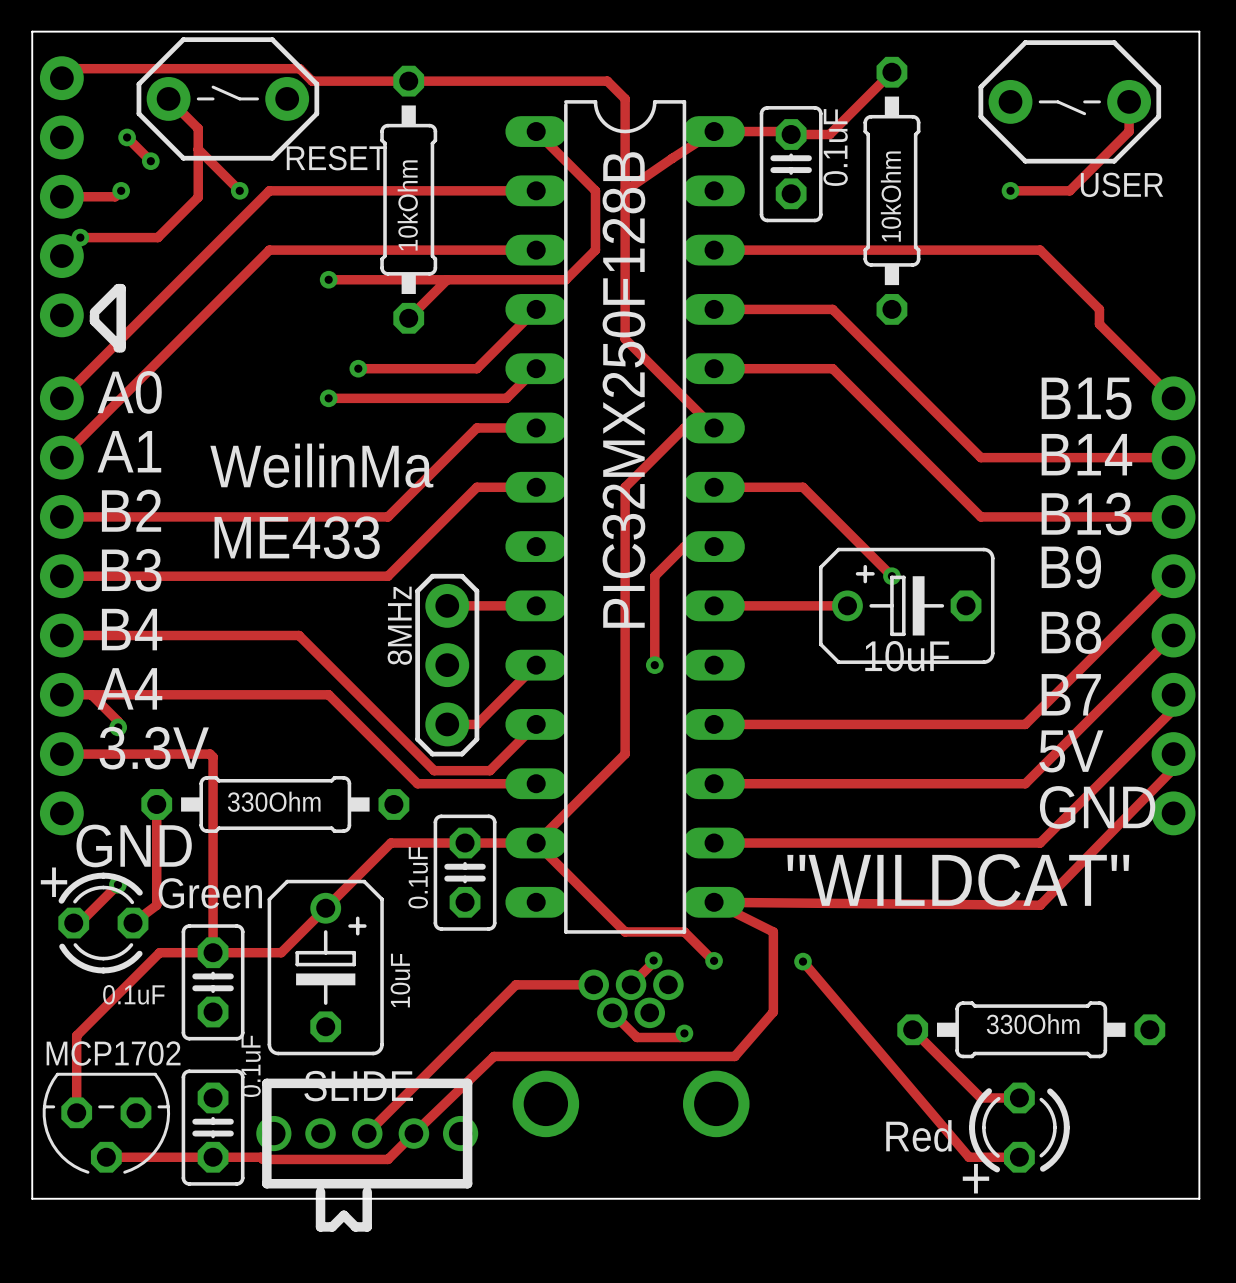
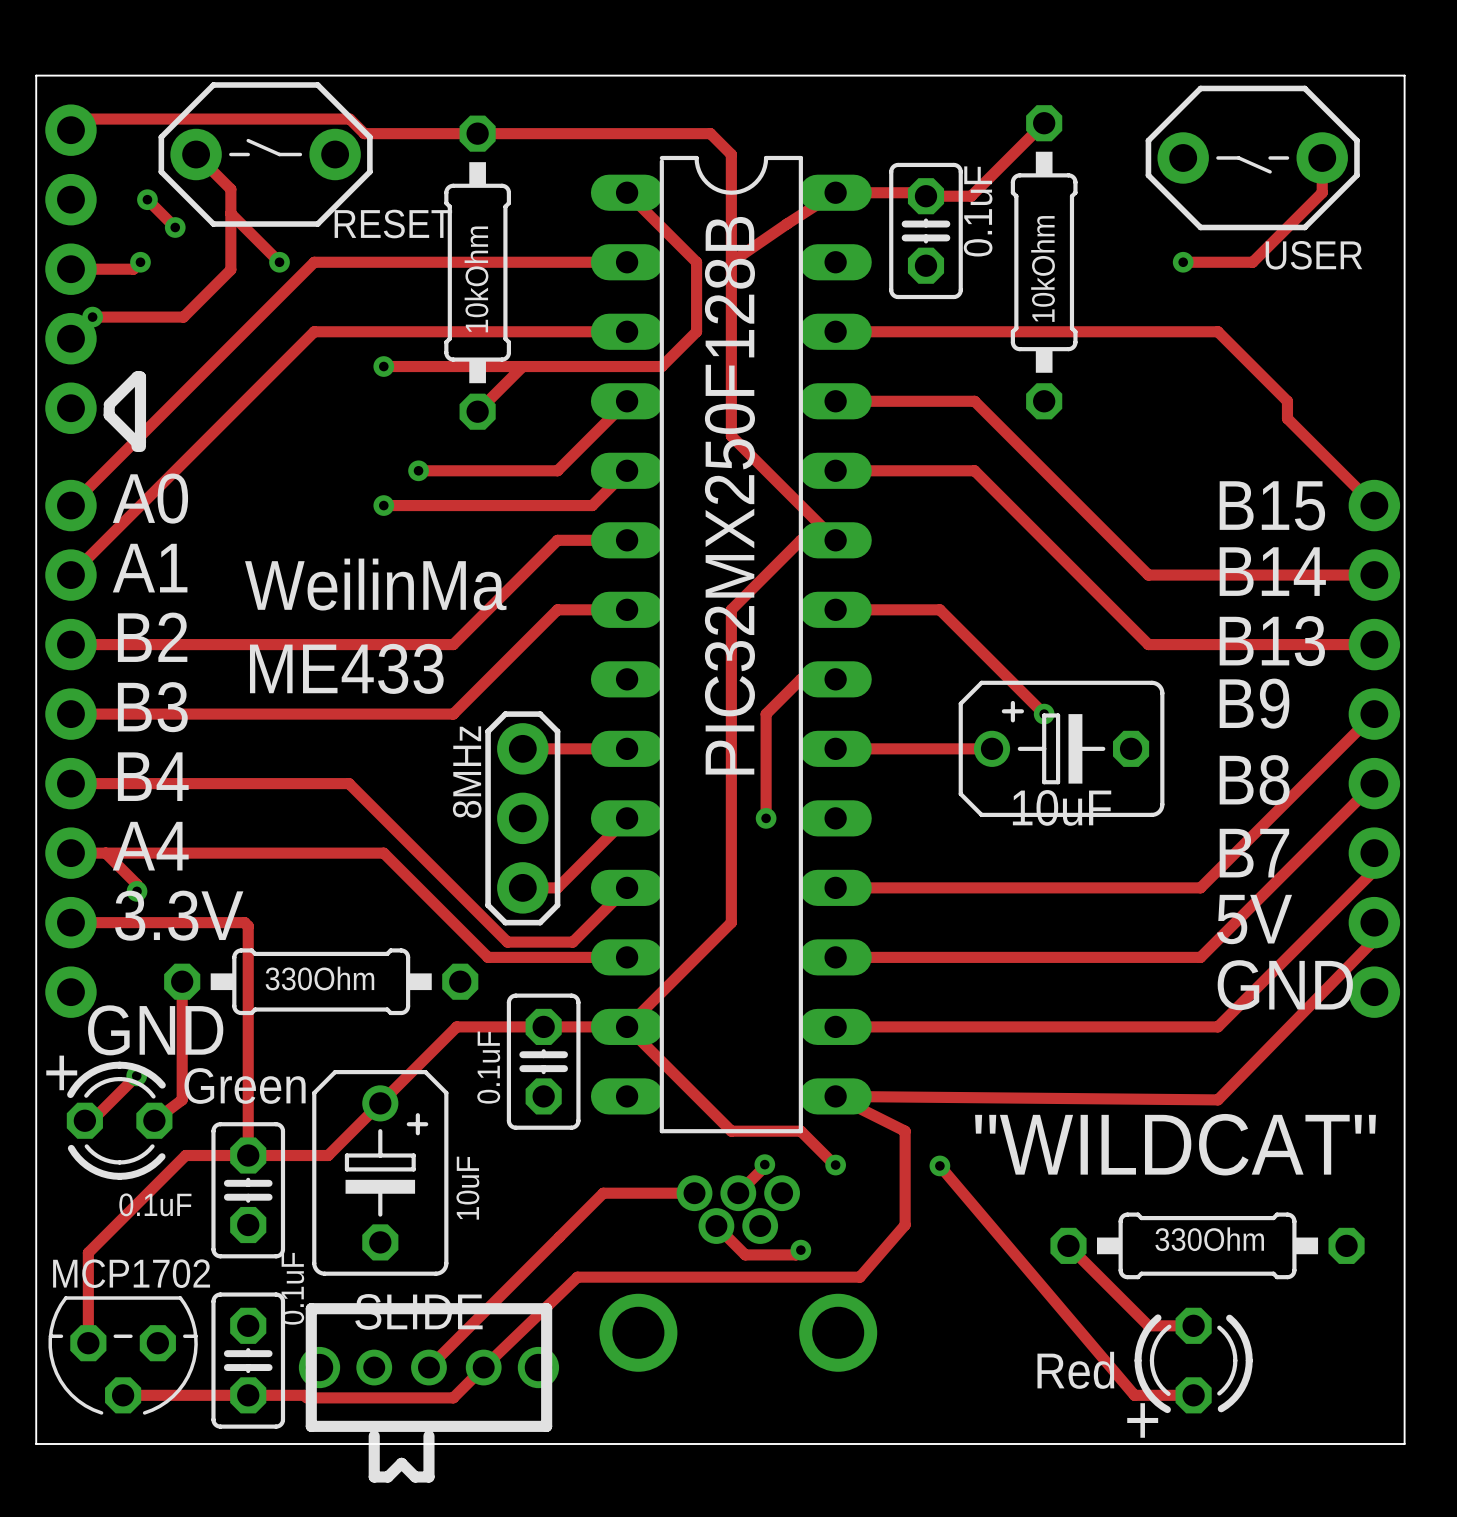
text position: "WILDCAT" (958, 880) -> "WILDCAT" (1175, 1144)

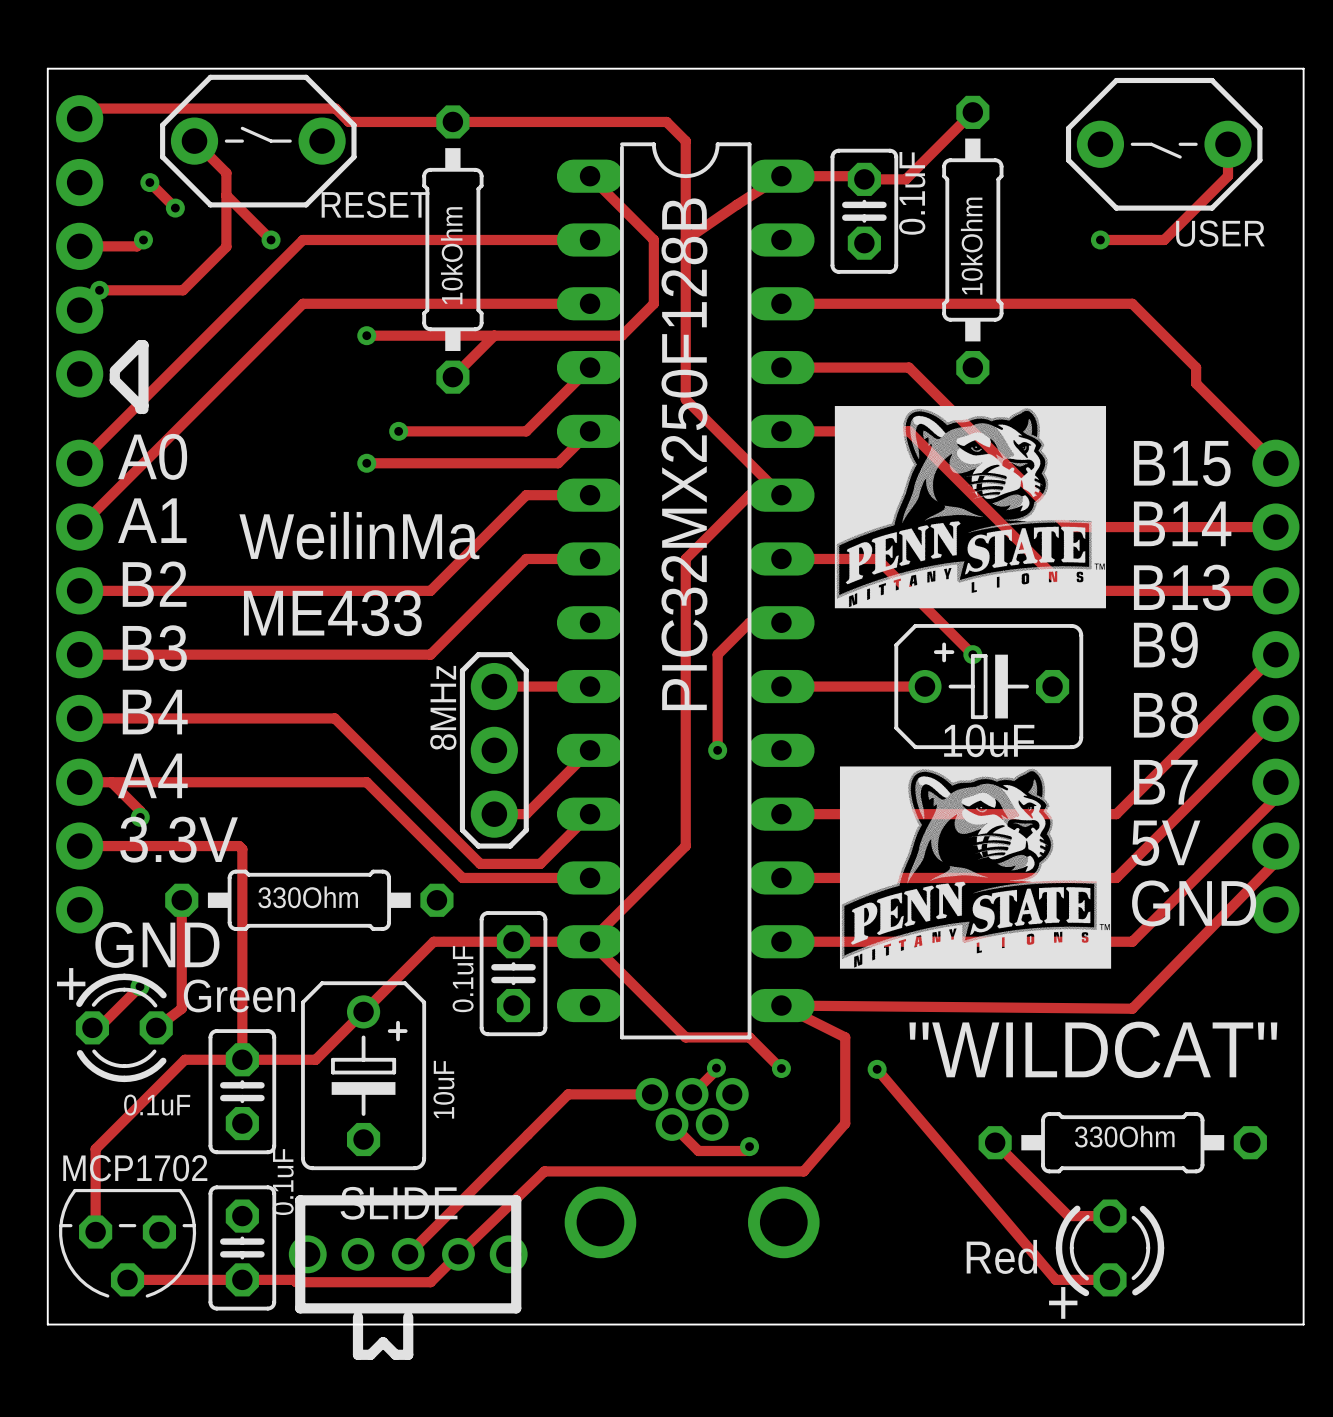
drawing: none -> [834, 406, 1107, 609]
drawing: none -> [839, 766, 1112, 969]

